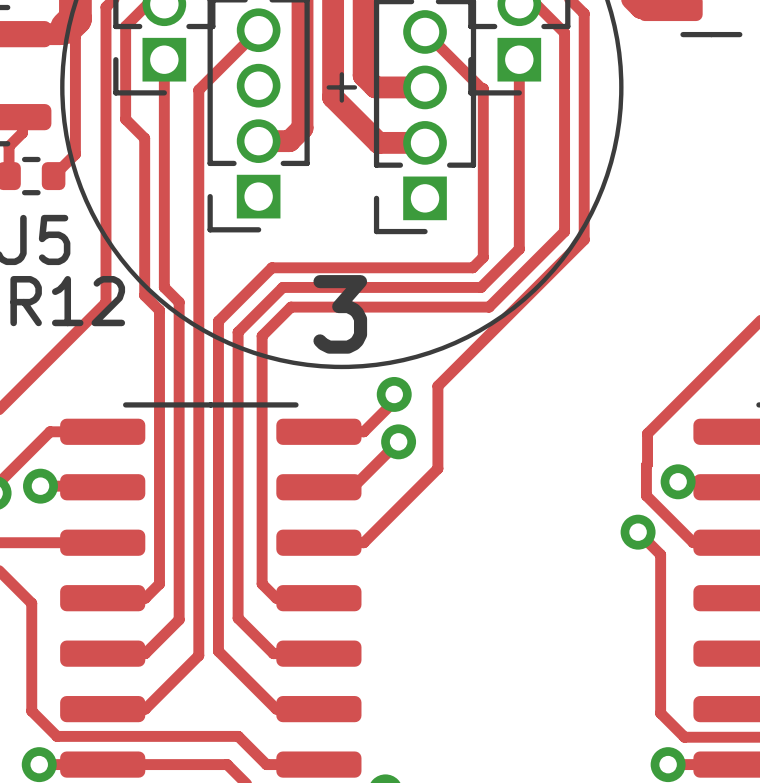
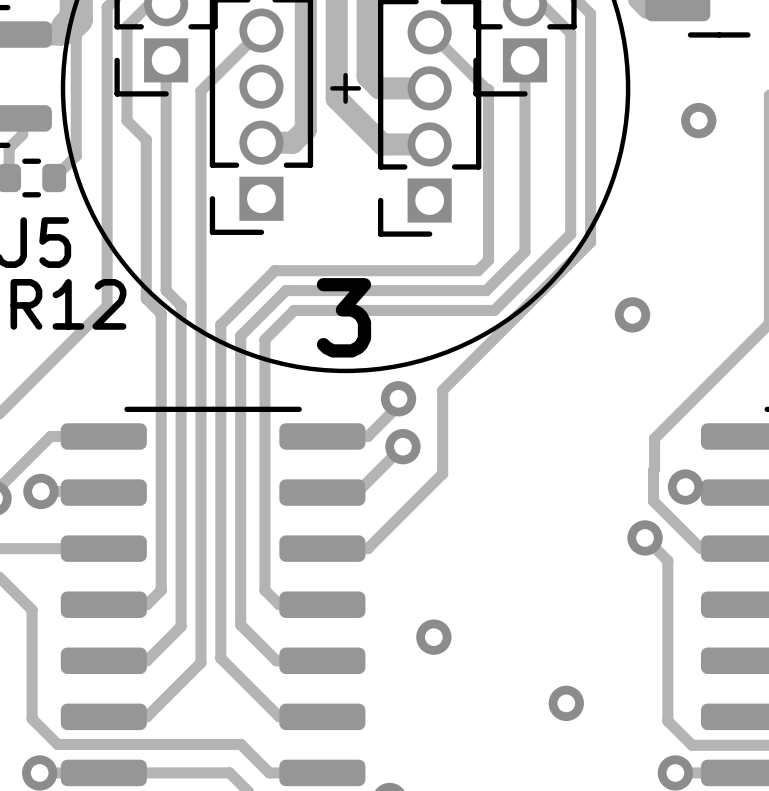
via: none -> (698, 120)
via: none -> (632, 314)
via: none -> (433, 637)
via: none -> (566, 703)

